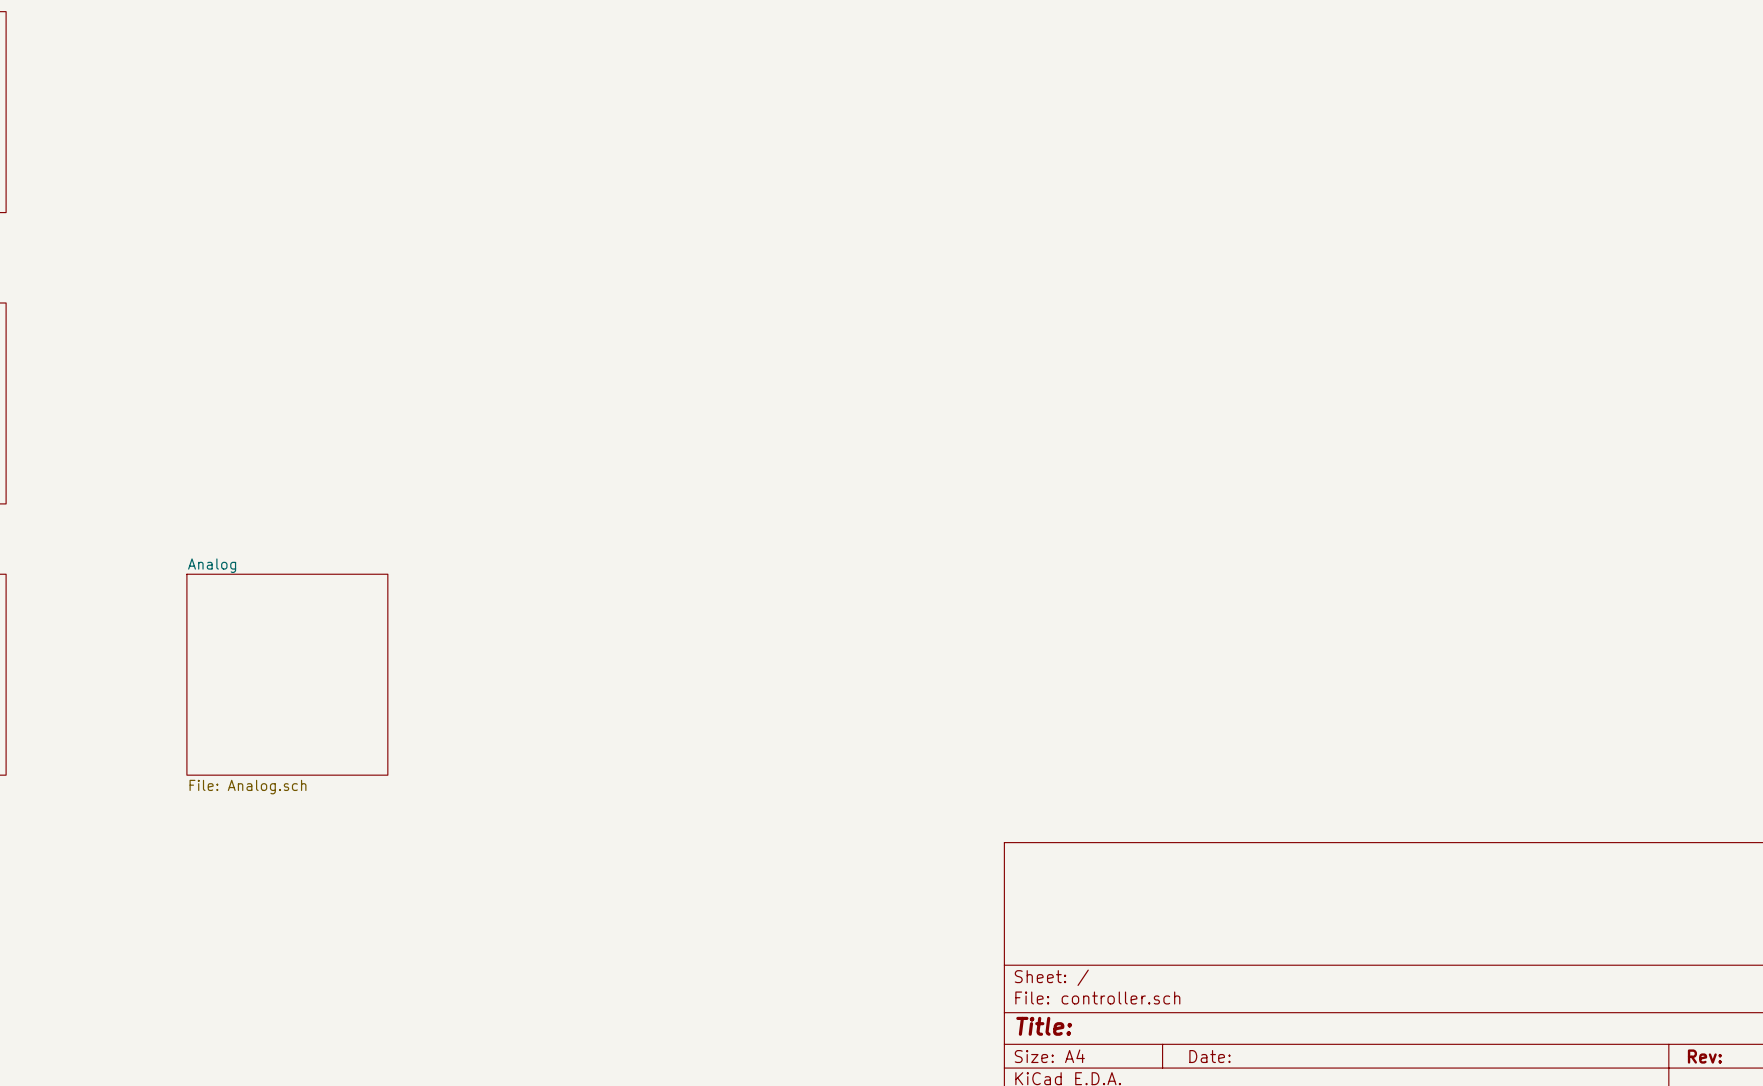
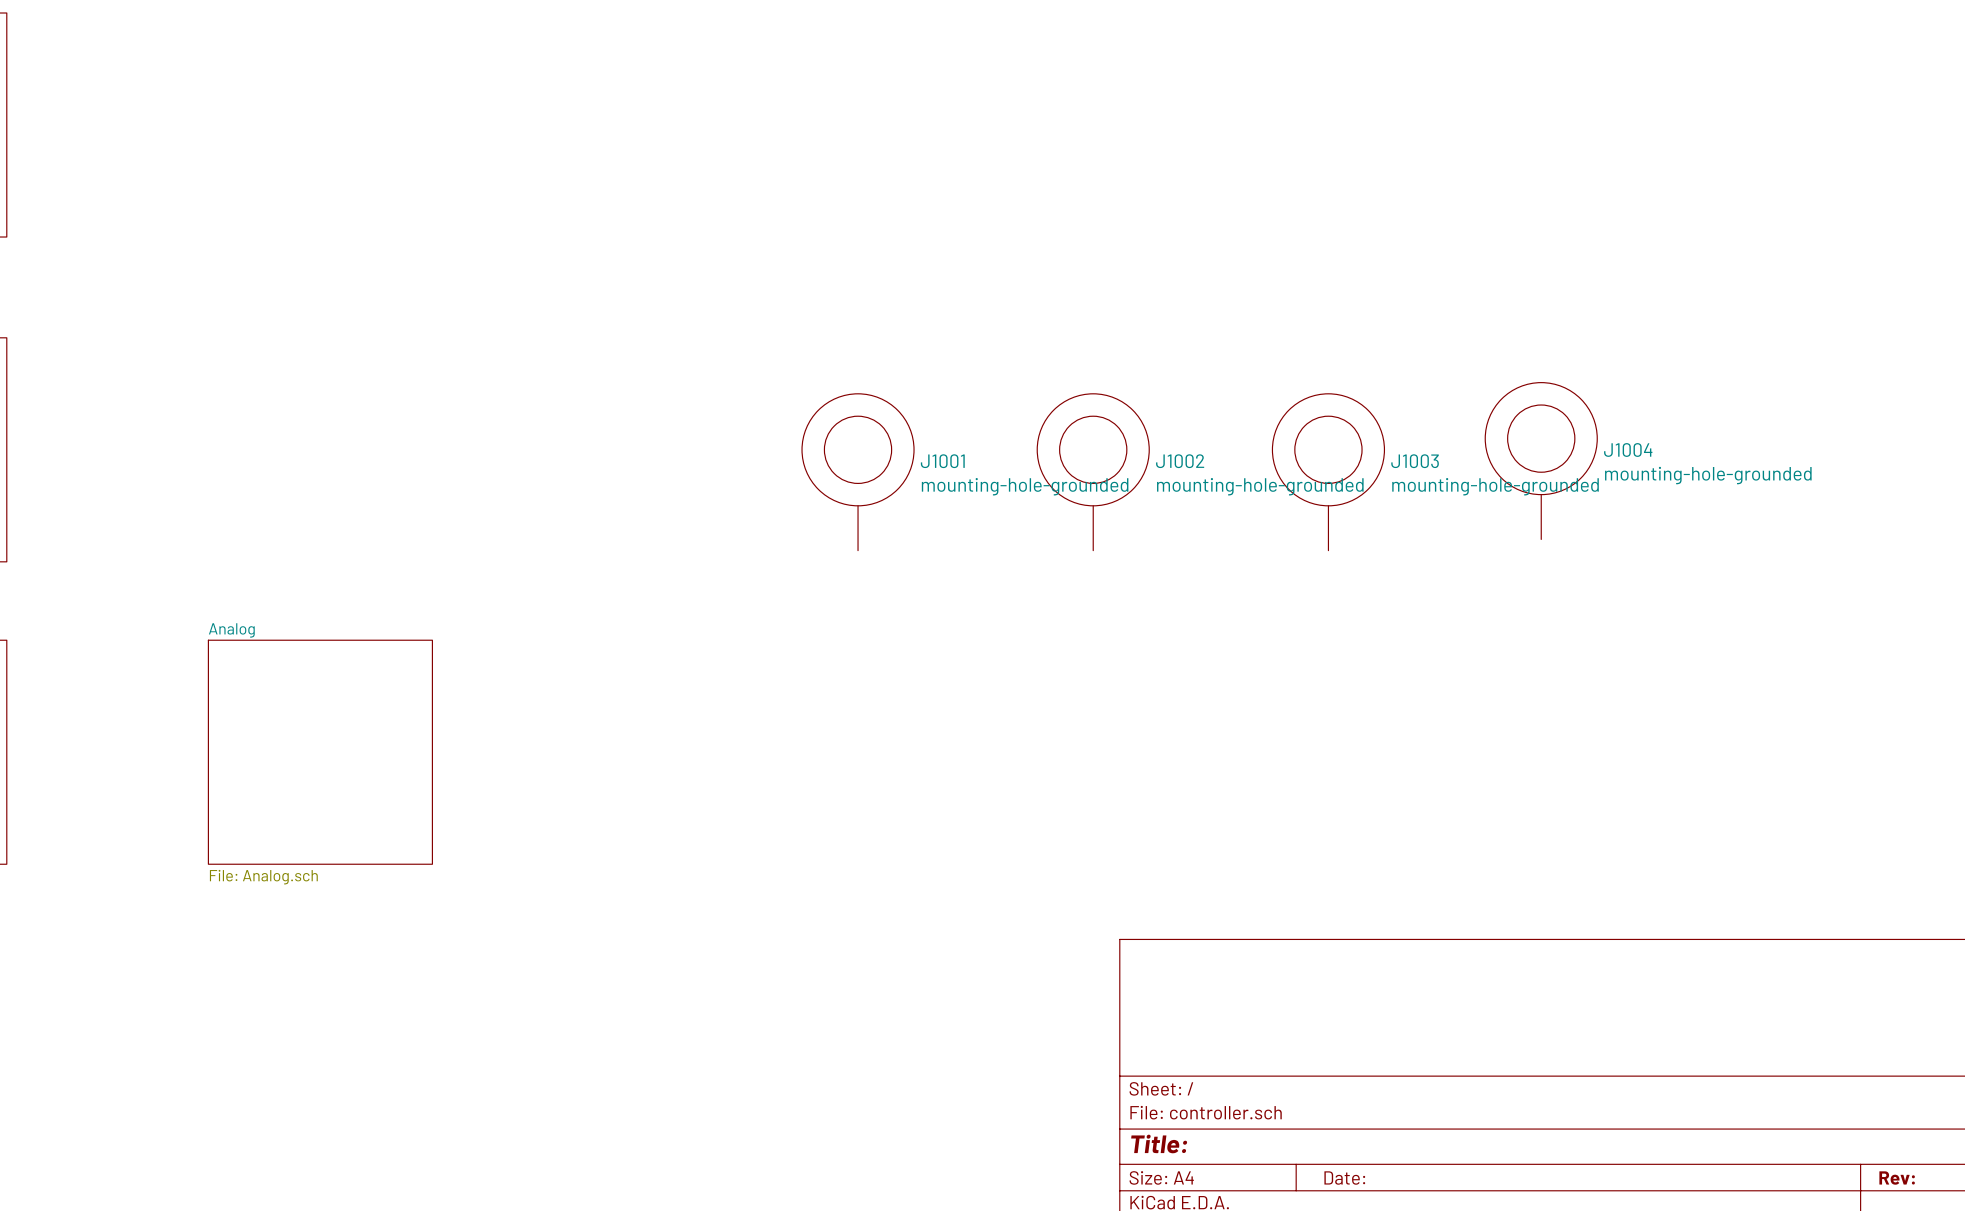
J1004: none -> mounting-hole-grounded (1541, 461)
J1001: none -> mounting-hole-grounded (858, 472)
J1002: none -> mounting-hole-grounded (1093, 472)
J1003: none -> mounting-hole-grounded (1328, 472)

